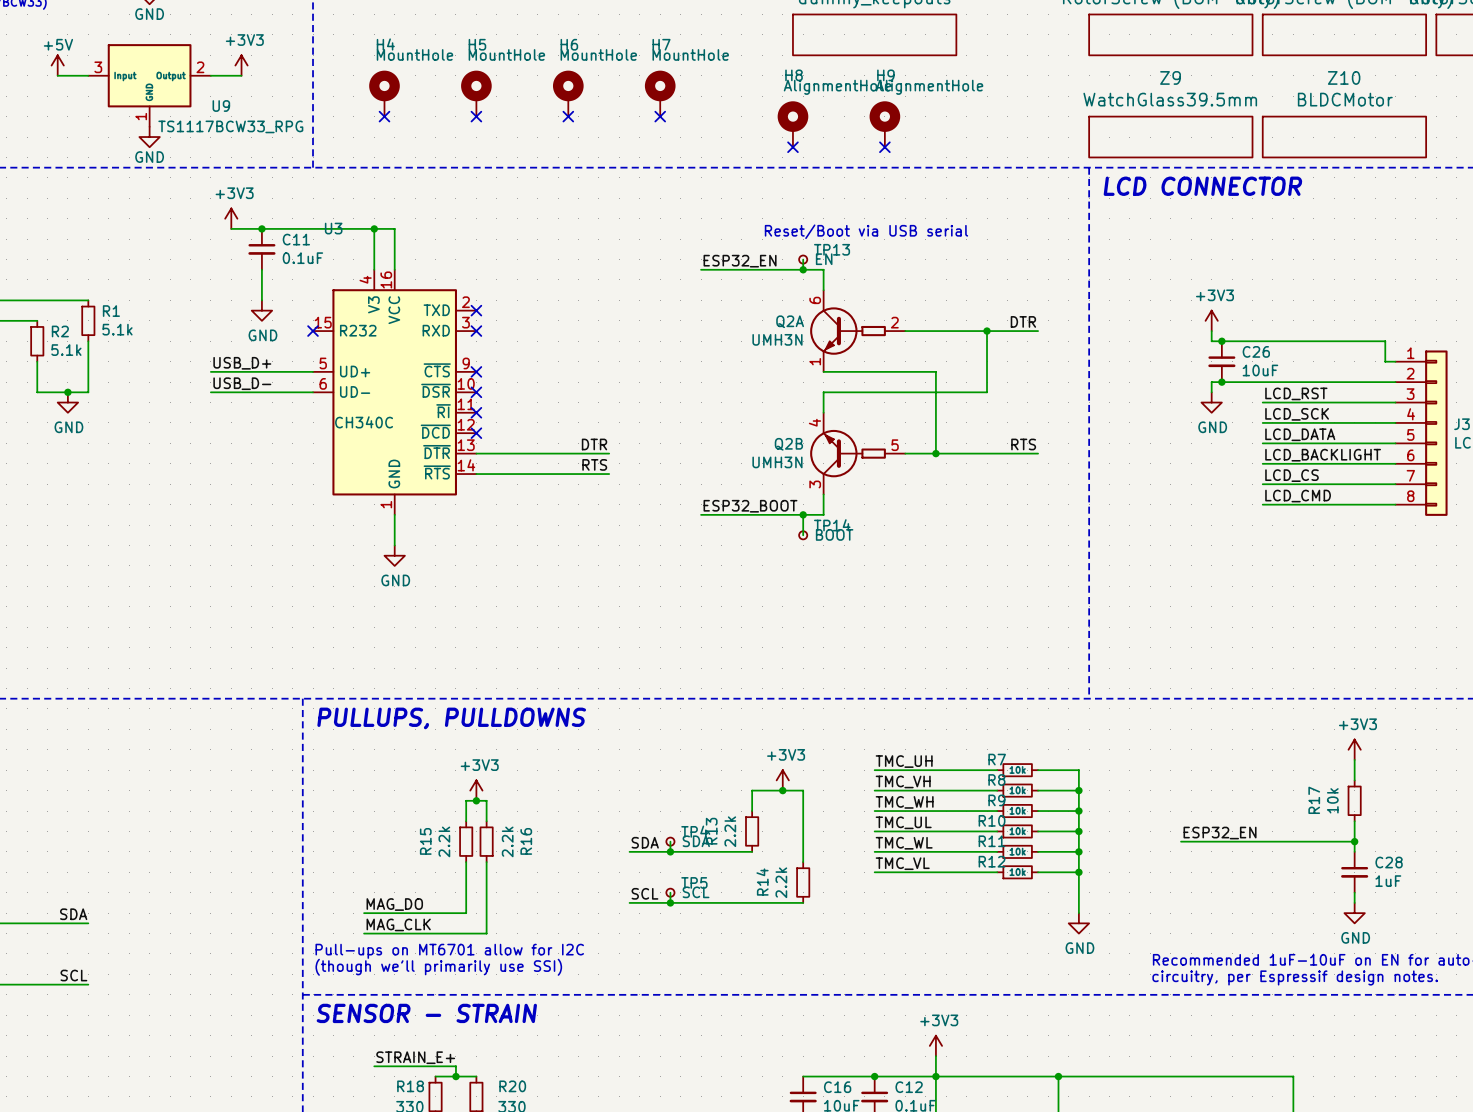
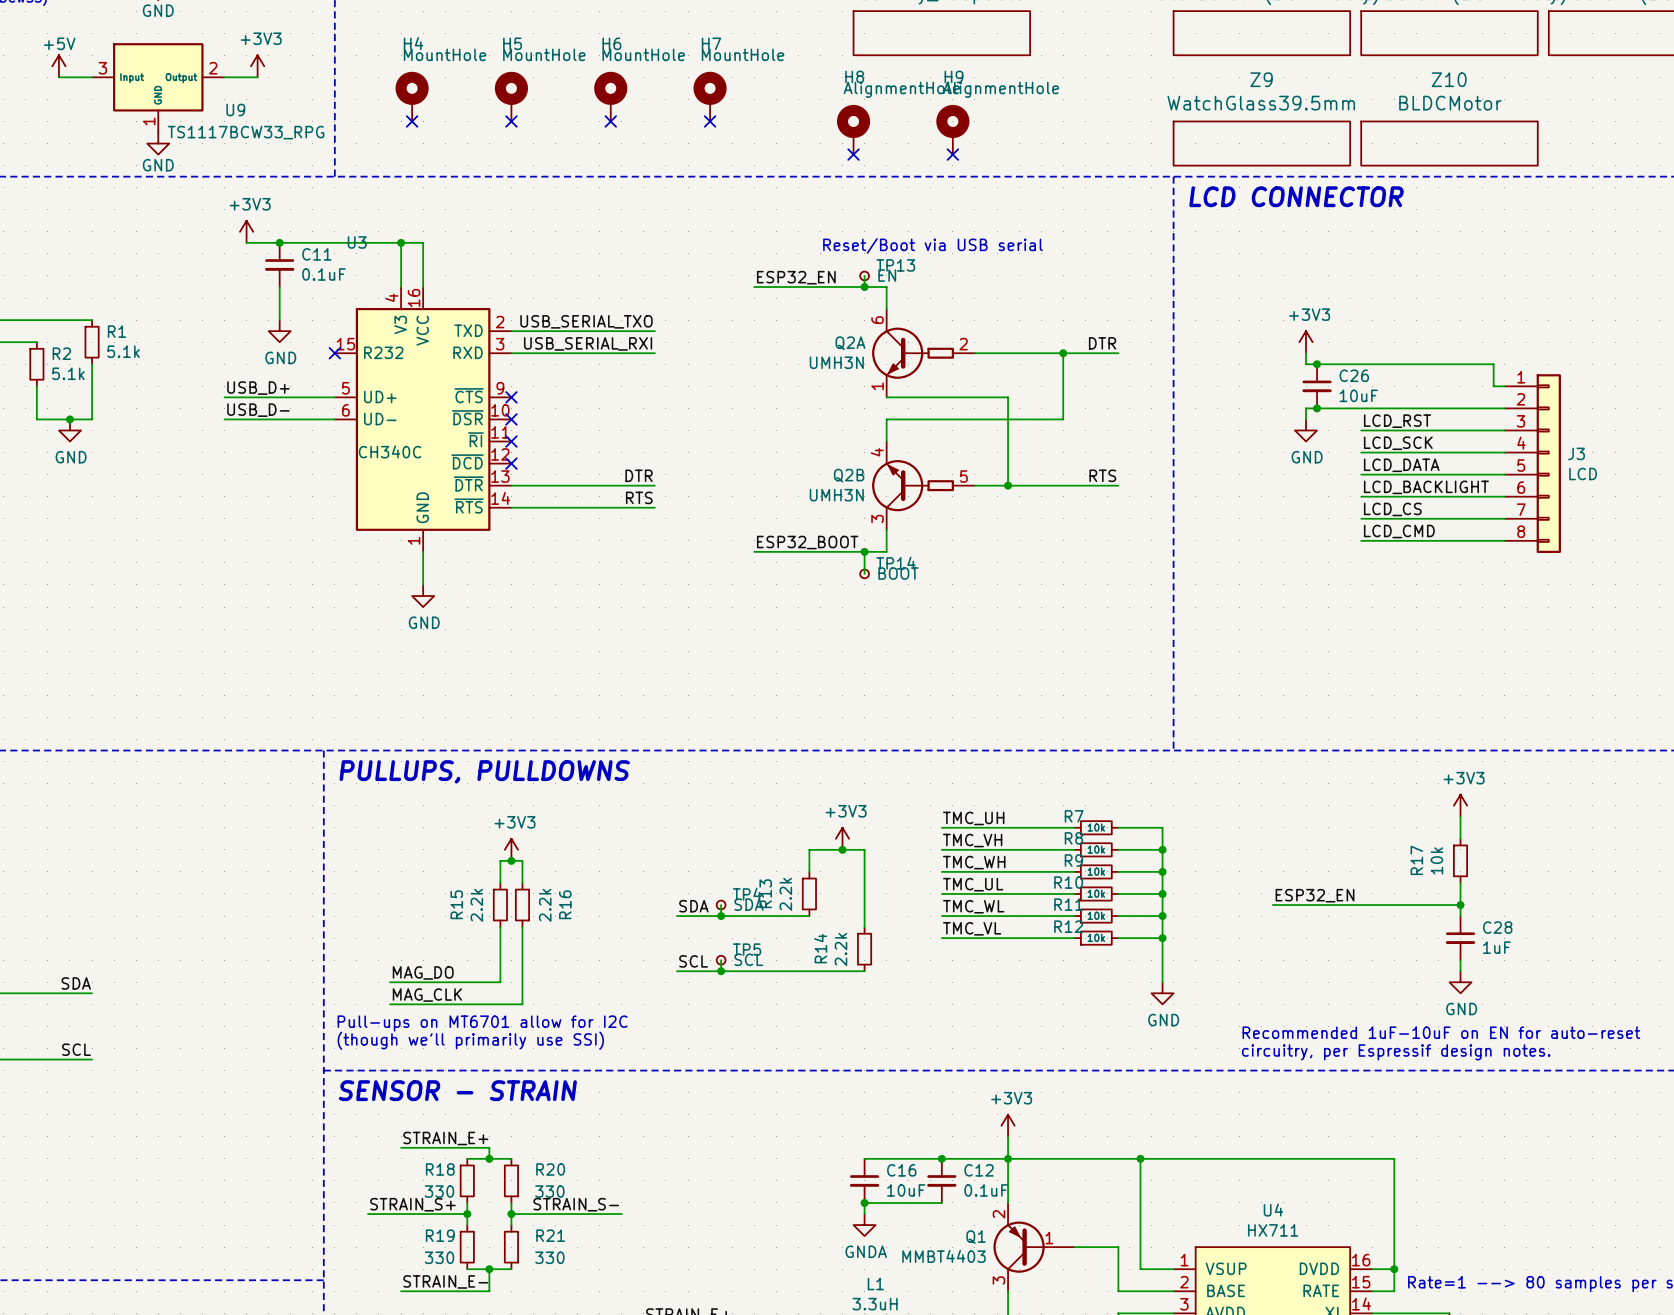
label: none -> USB_SERIAL_TXO (586, 321)
wire: none -> (511, 331) (654, 331)
no-connect mark: (476, 310) -> none
label: none -> USB_SERIAL_RXI (588, 343)
wire: none -> (511, 353) (654, 353)
no-connect mark: (476, 331) -> none

